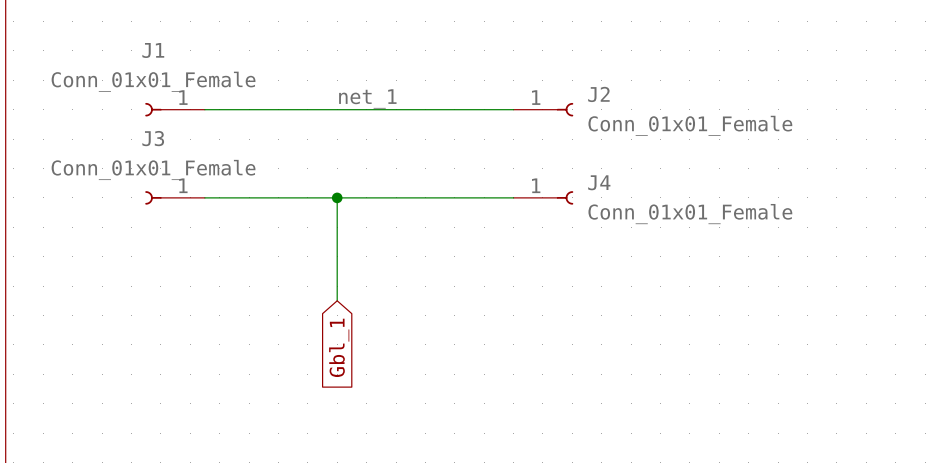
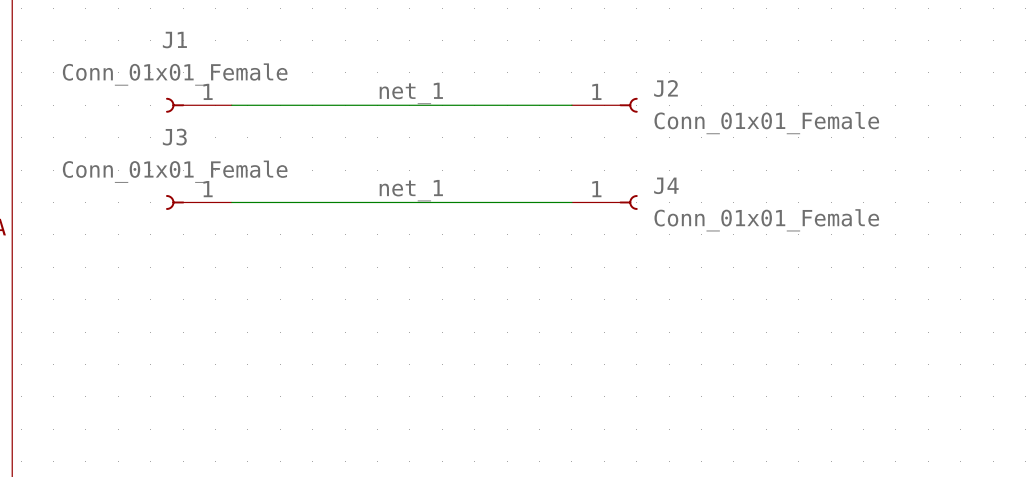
label: none -> net_1 (411, 190)
wire: (337, 197) (337, 300) -> none
junction: (337, 197) -> none
global label: Gbl_1 (339, 347) -> none

